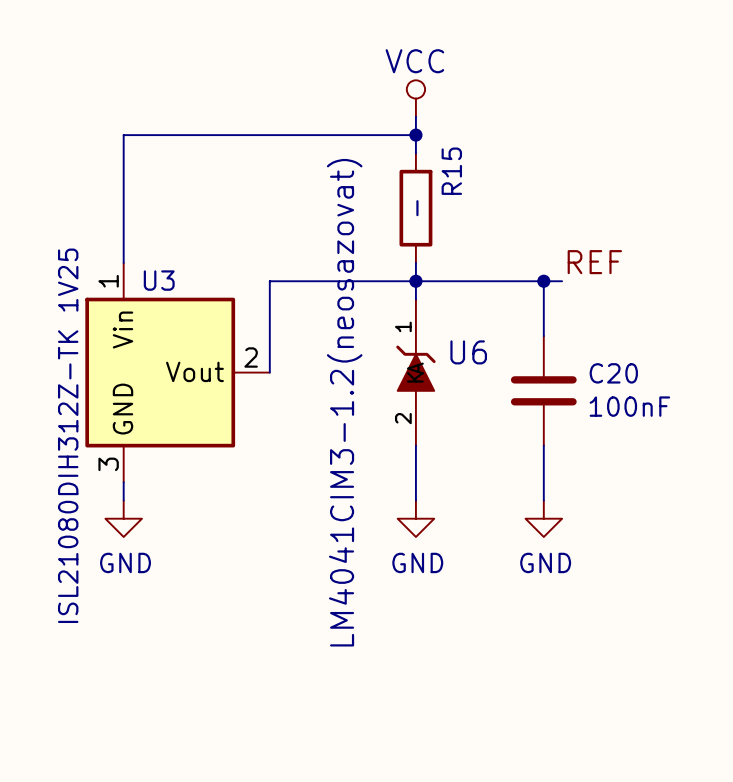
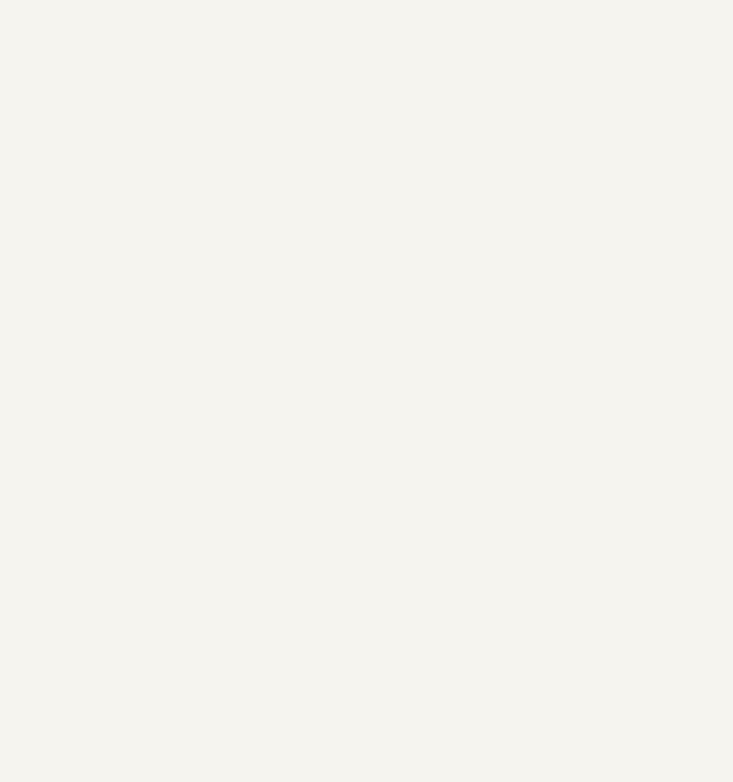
power symbol: VCC (415, 98) -> none
wire: (415, 116) (415, 153) -> none
wire: (415, 135) (123, 135) (123, 262) -> none
junction: (415, 135) -> none
R15: - (415, 208) -> none
wire: (415, 262) (415, 299) -> none
label: REF (594, 262) -> none
junction: (415, 281) -> none
wire: (543, 281) (543, 336) -> none
junction: (543, 281) -> none
wire: (562, 281) (269, 281) (269, 372) -> none
U3: ISL21080DIH312Z-TK 1V25 (177, 372) -> none
U6: LM4041CIM3-1.2(neosazovat) (415, 372) -> none
C20: 100nF (543, 390) -> none
wire: (415, 445) (415, 500) -> none
wire: (543, 445) (543, 500) -> none
wire: (123, 482) (123, 500) -> none
power symbol: GND (123, 518) -> none
power symbol: GND (415, 518) -> none
power symbol: GND (543, 518) -> none

